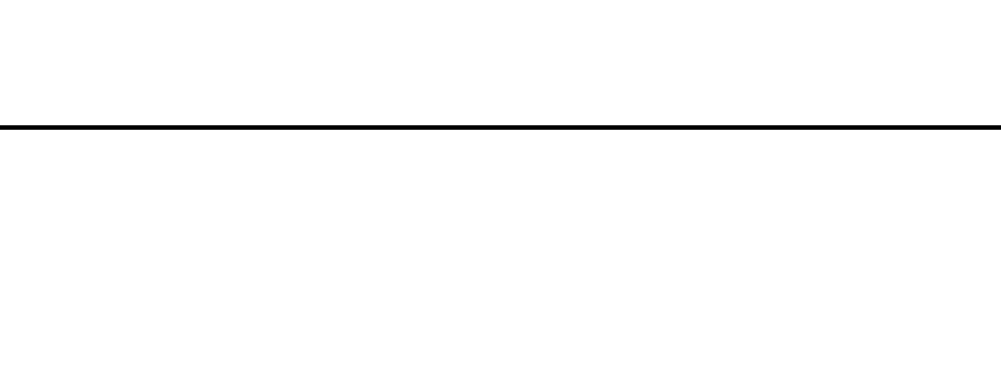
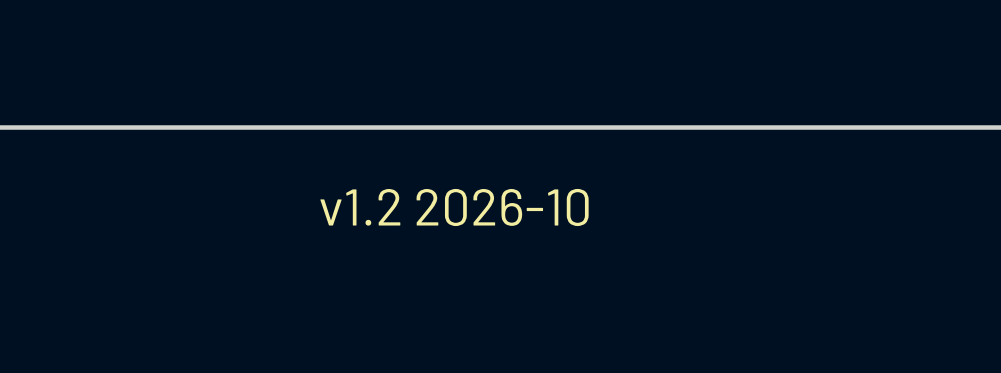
text: none -> v1.2 2026-10 (454, 207)

